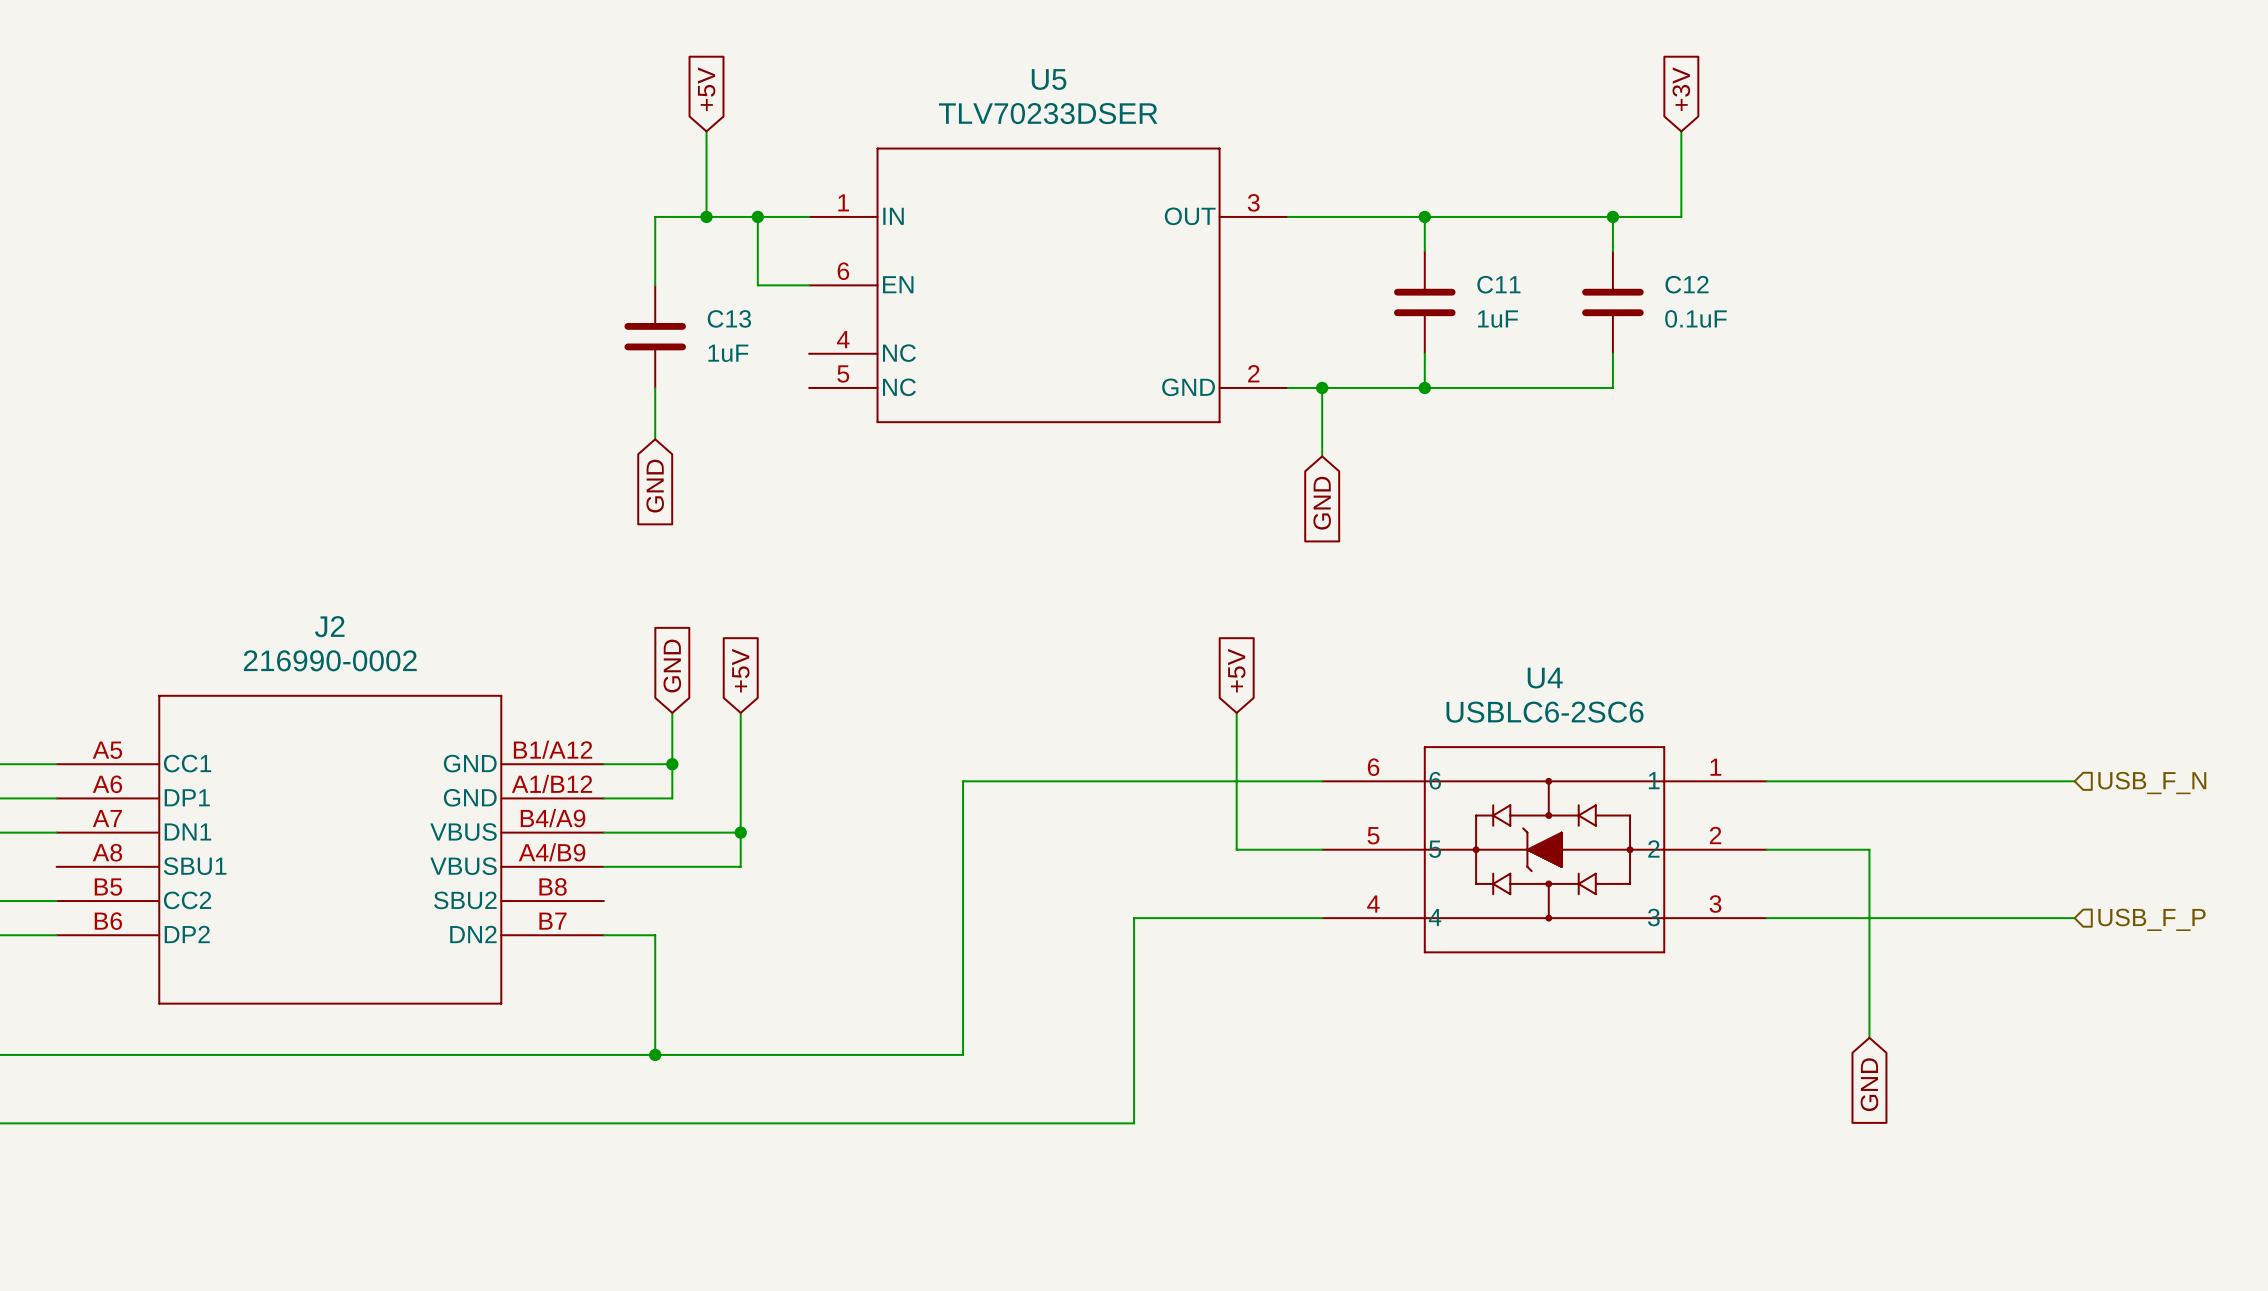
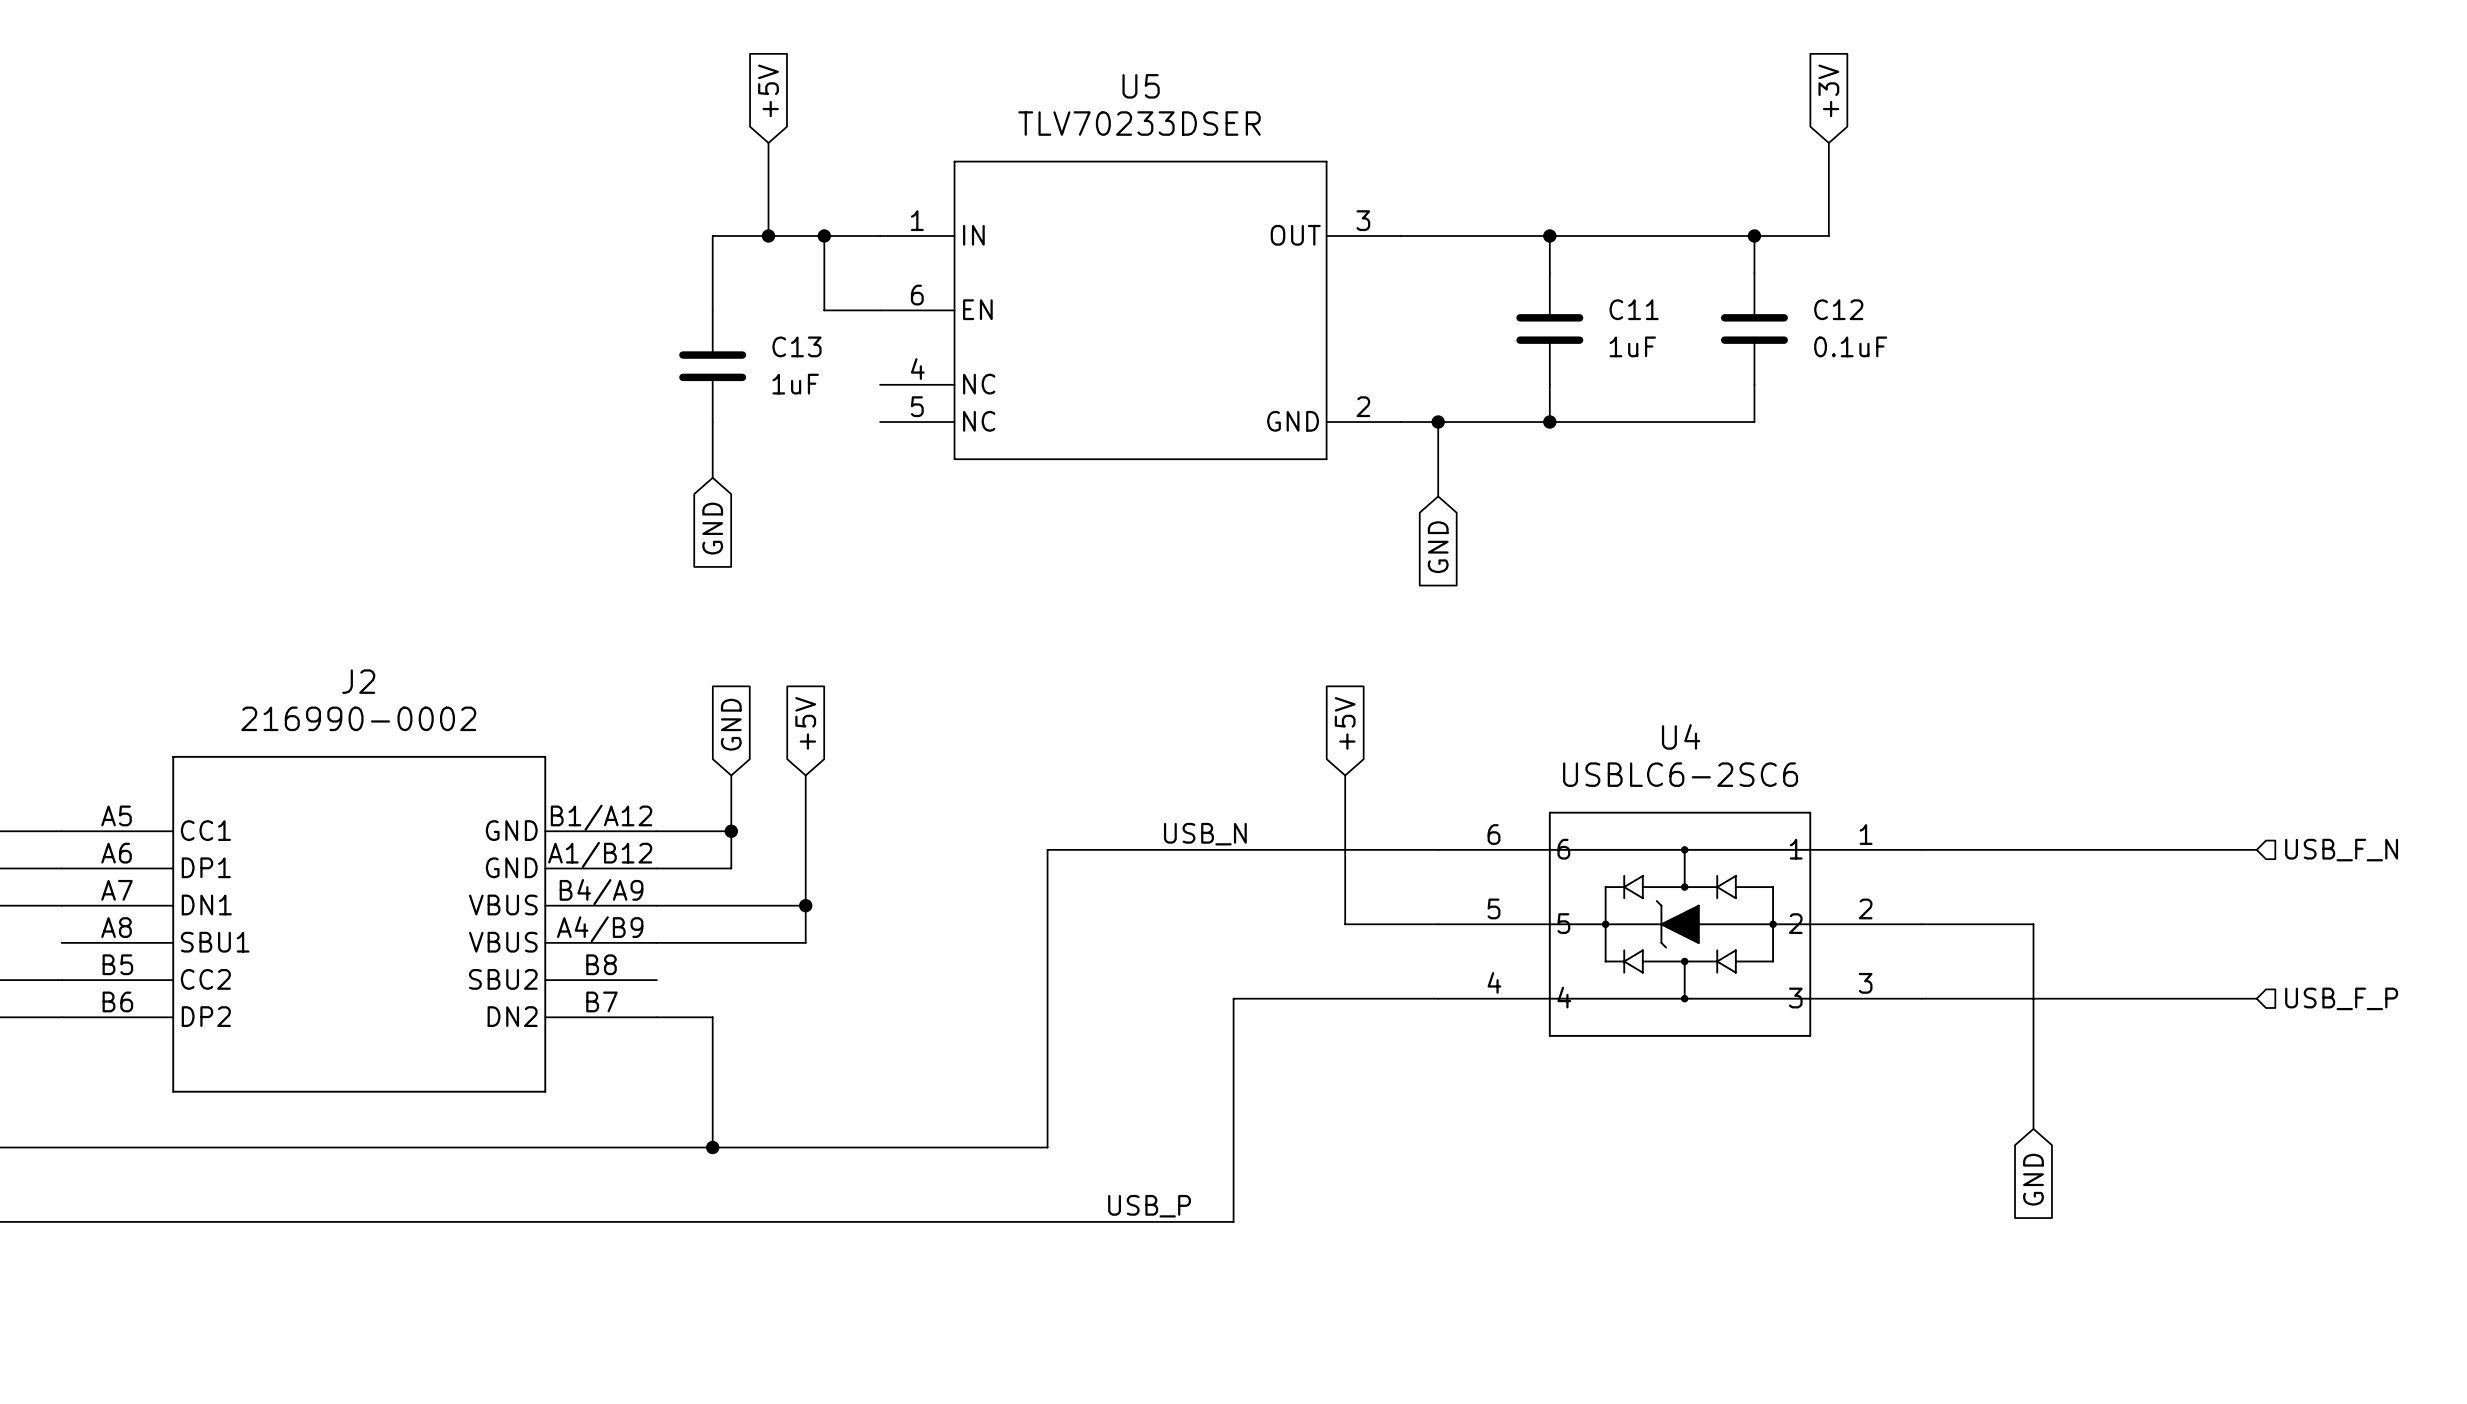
label: none -> USB_N (1205, 834)
label: none -> USB_P (1149, 1206)

